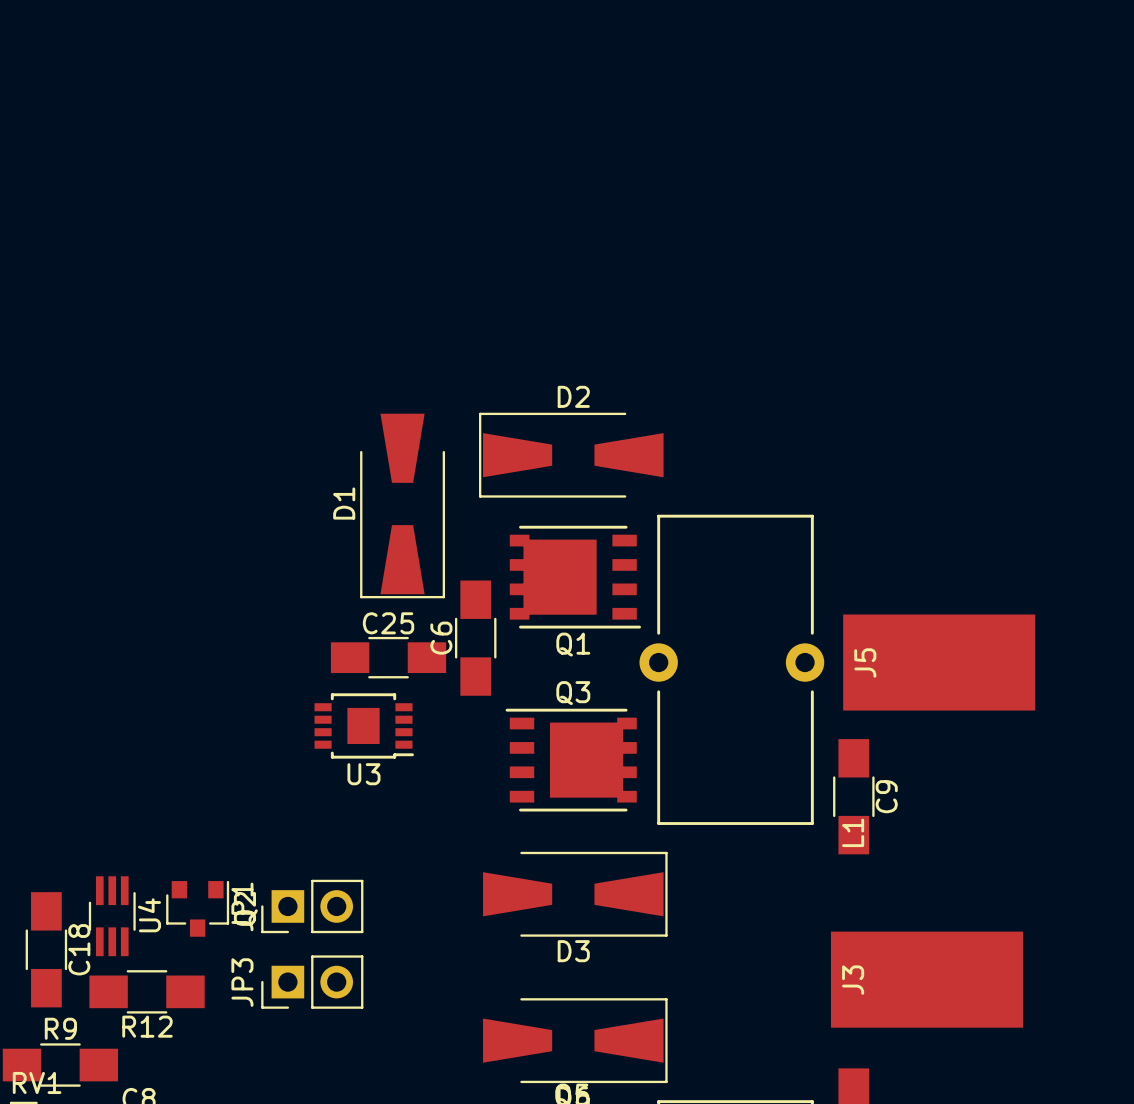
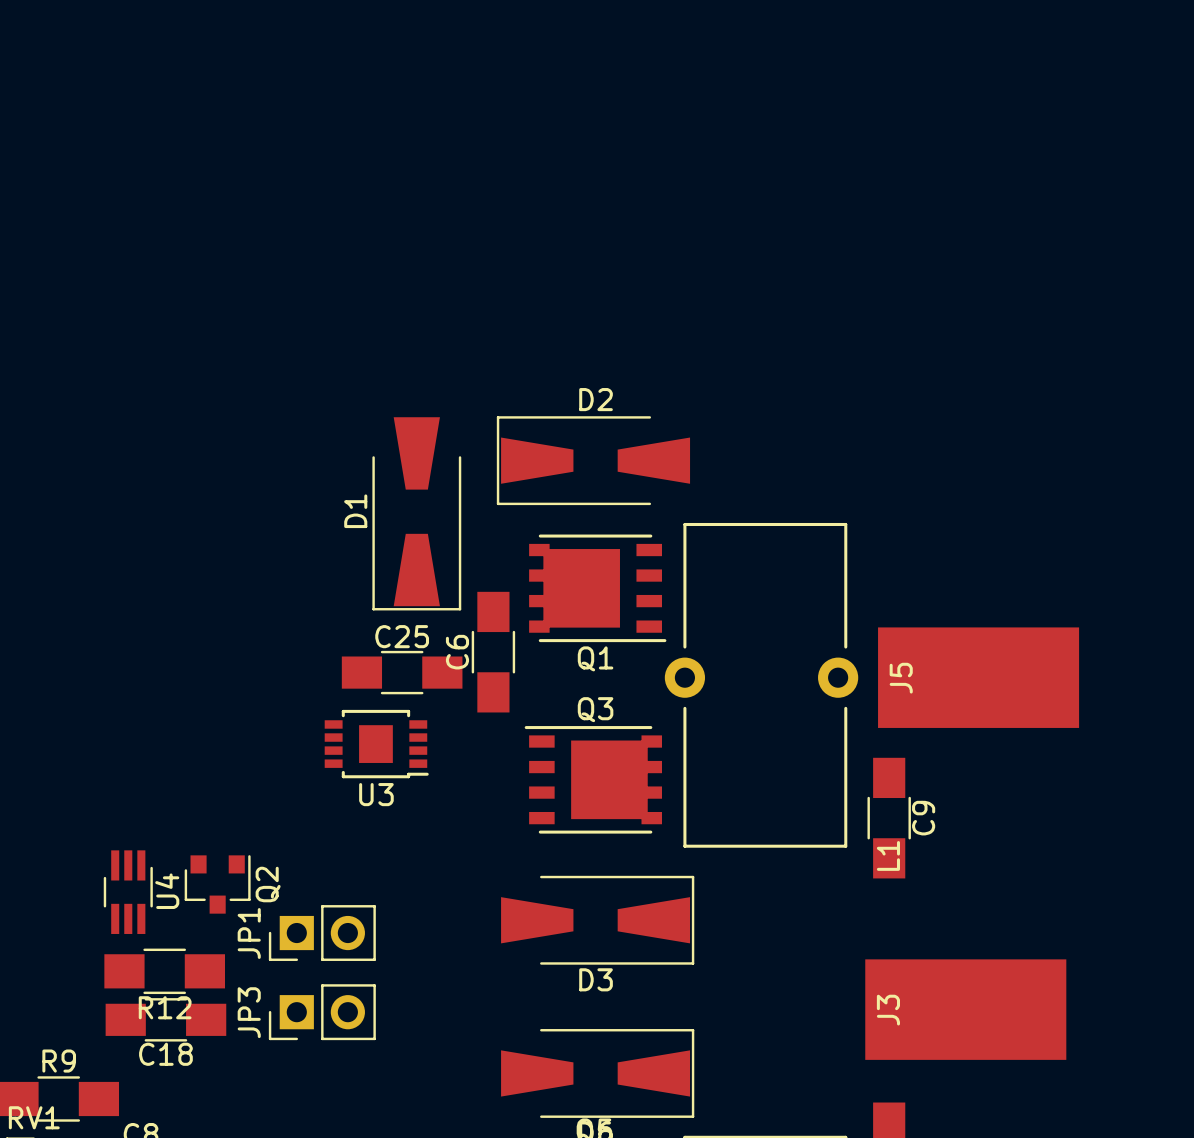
Q2 position: (197, 908) -> (217, 884)
U4 position: (112, 916) -> (128, 892)
C18 rotation: 0° (46, 949) -> 90° clockwise (165, 1019)
C18 position: (46, 949) -> (165, 1019)
R12 position: (147, 991) -> (164, 971)

